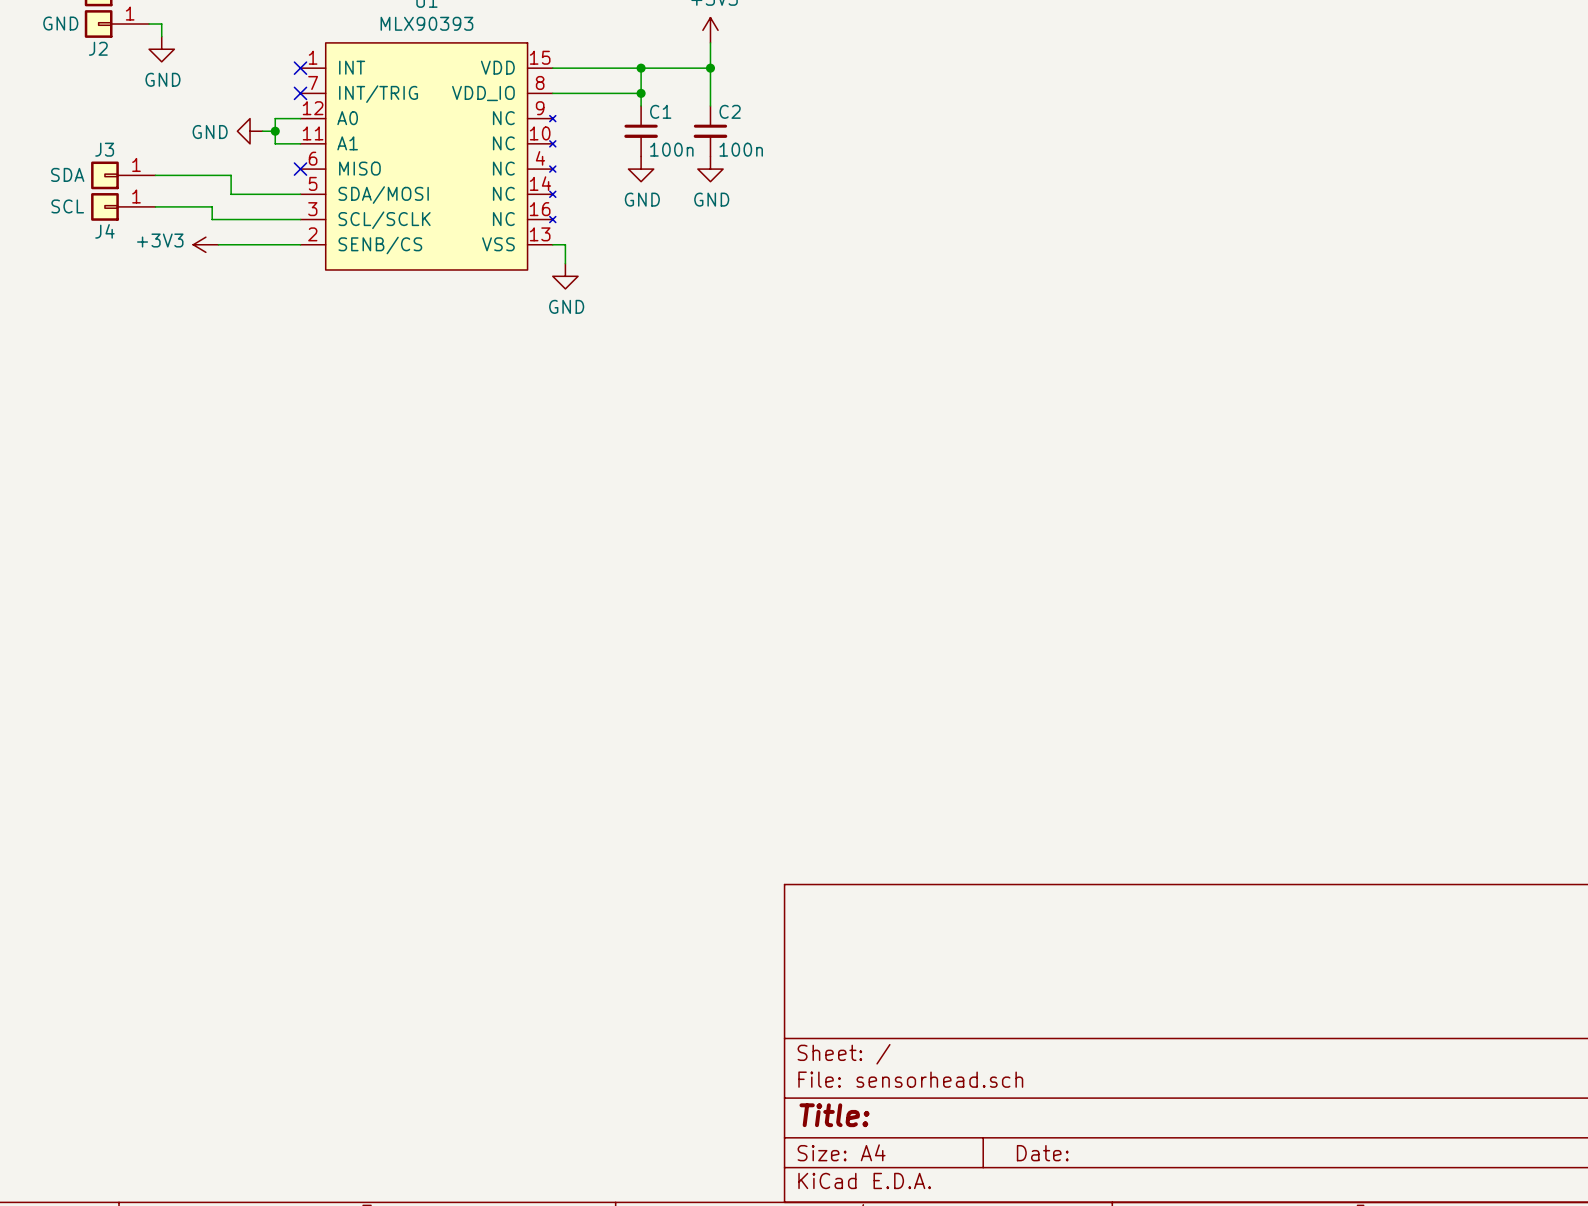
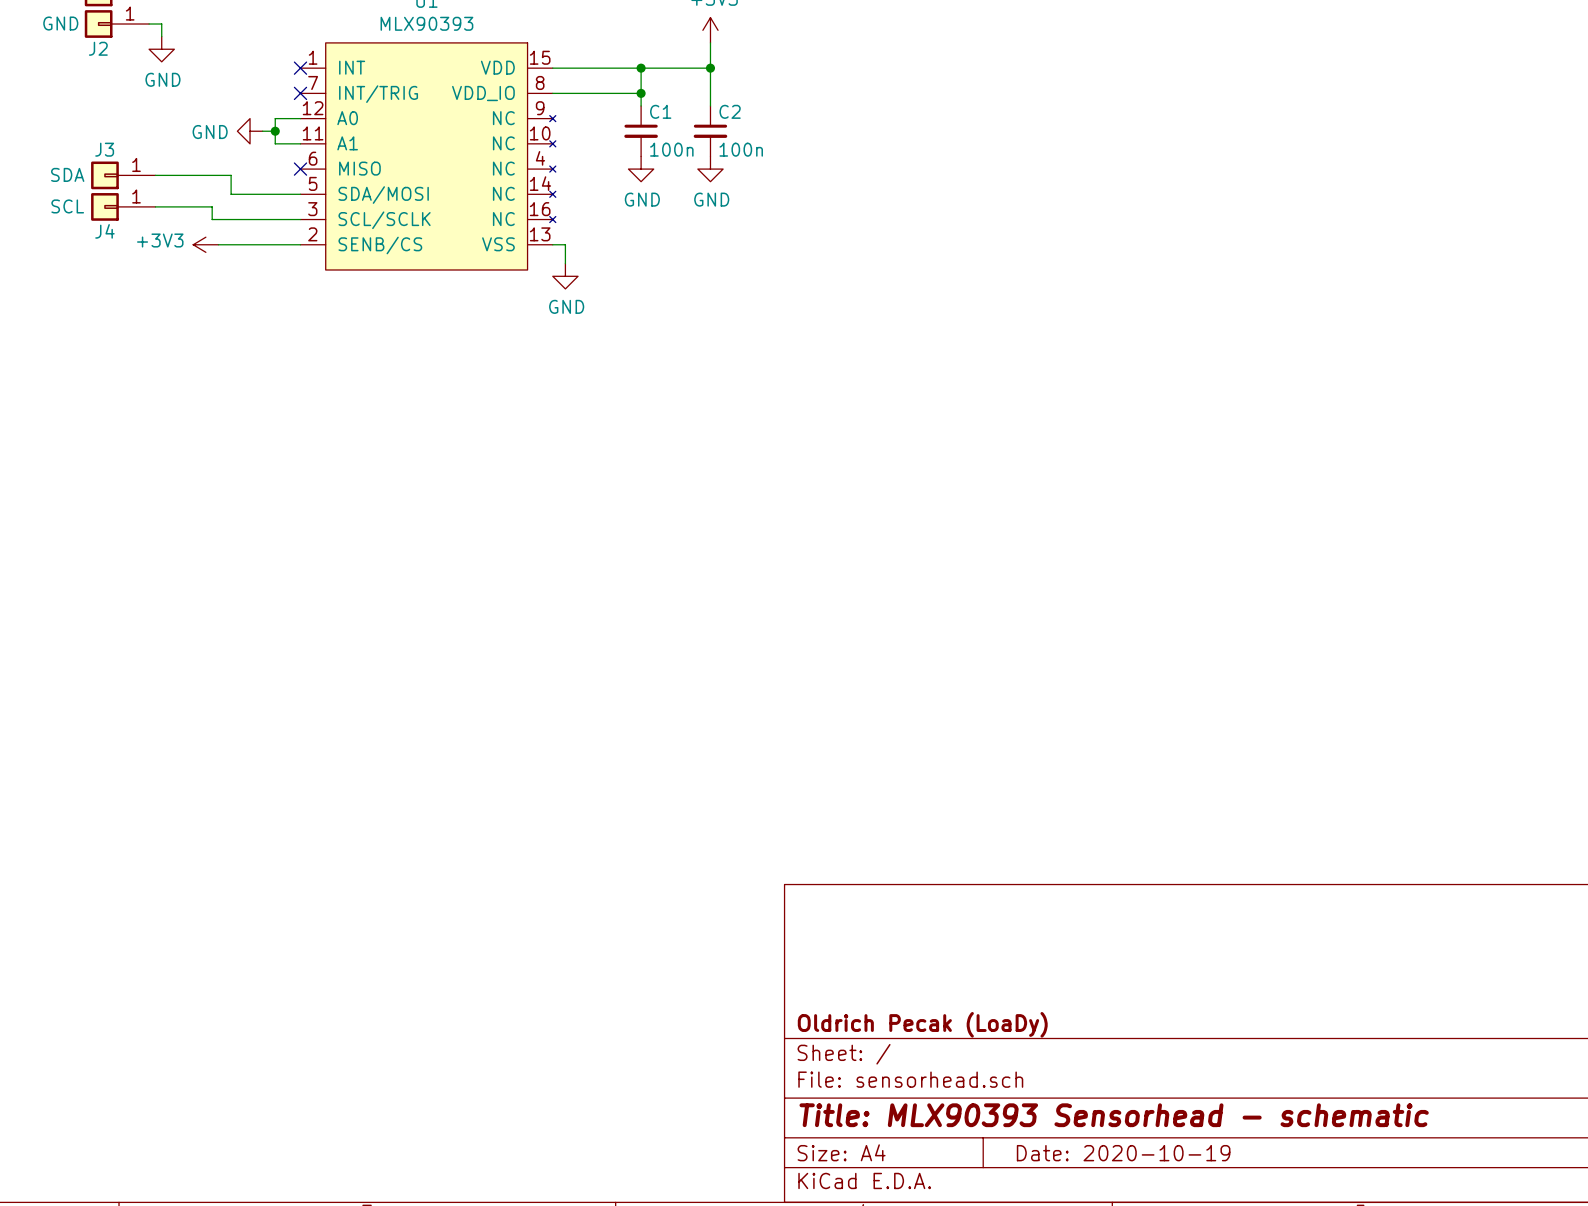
title block: none -> Oldrich Pecak (LoaDy) (922, 1024)
title block: Title: (834, 1115) -> Title: MLX90393 Sensorhead - schematic (1114, 1115)
title block: Date: (1042, 1153) -> Date: 2020-10-19 (1123, 1153)

